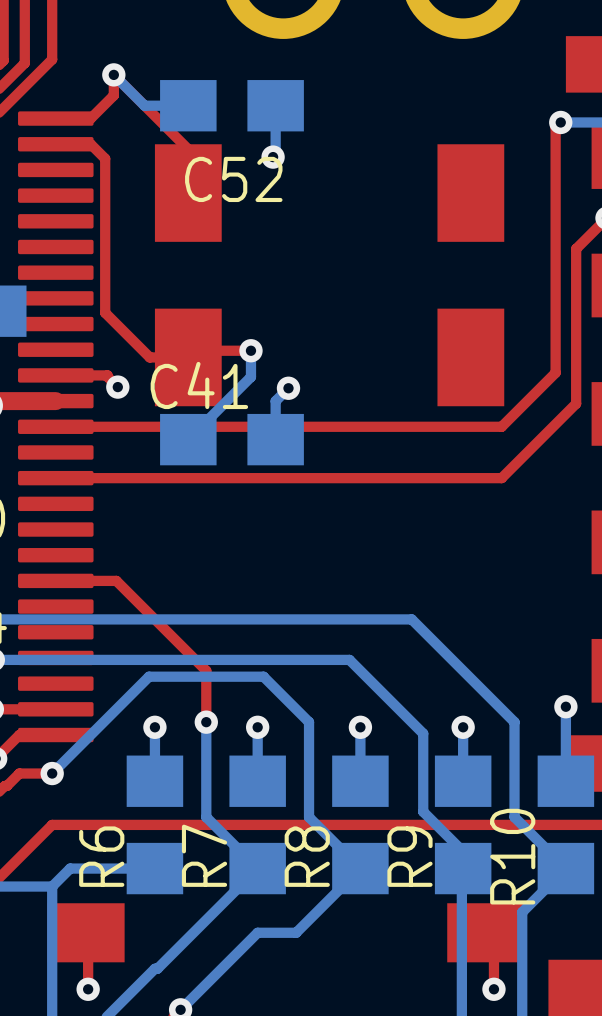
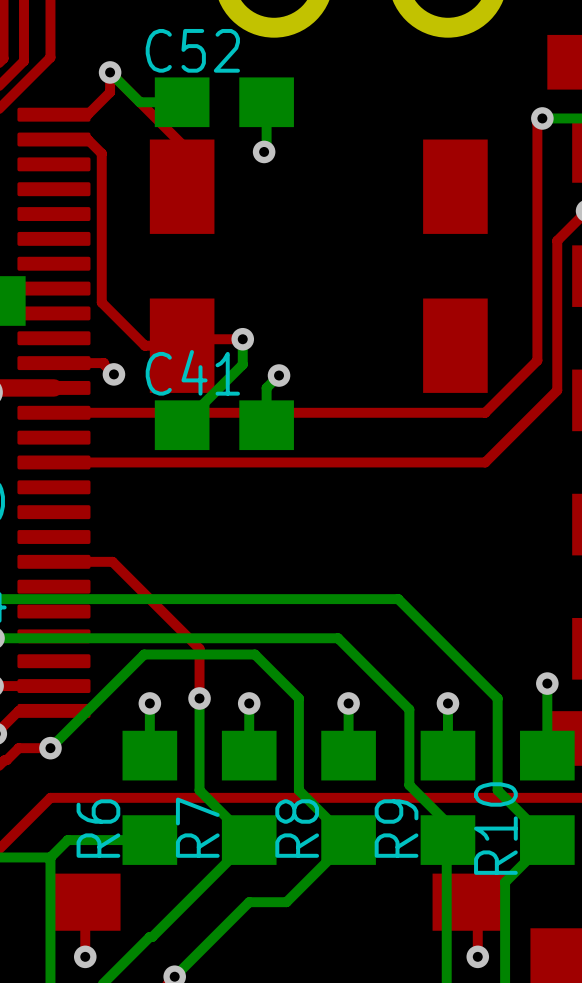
C52 name position: C52 (233, 179) -> C52 (192, 50)

